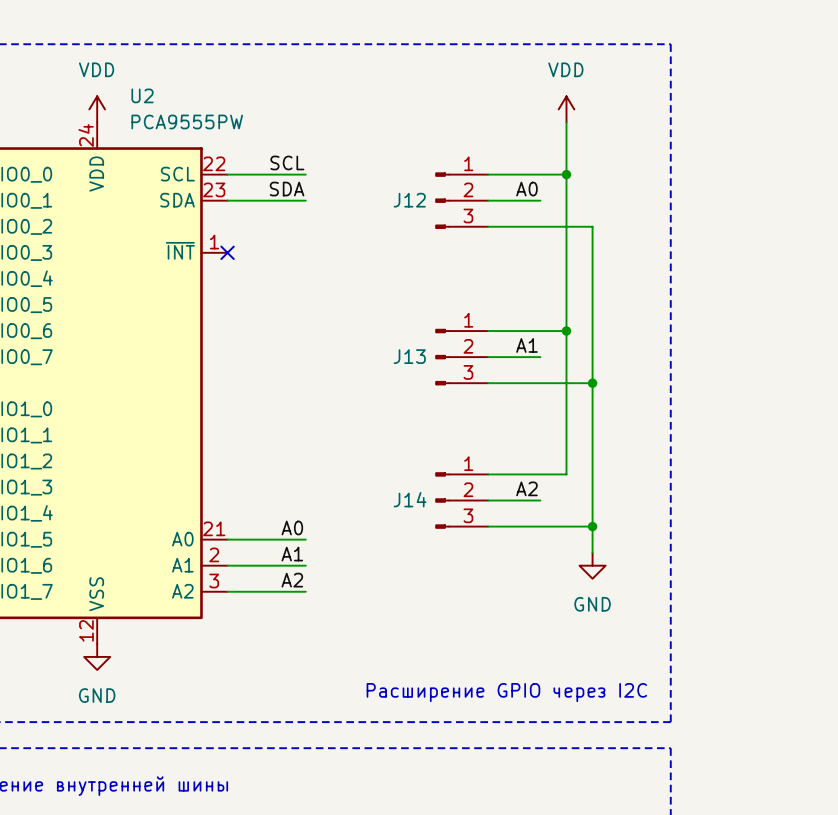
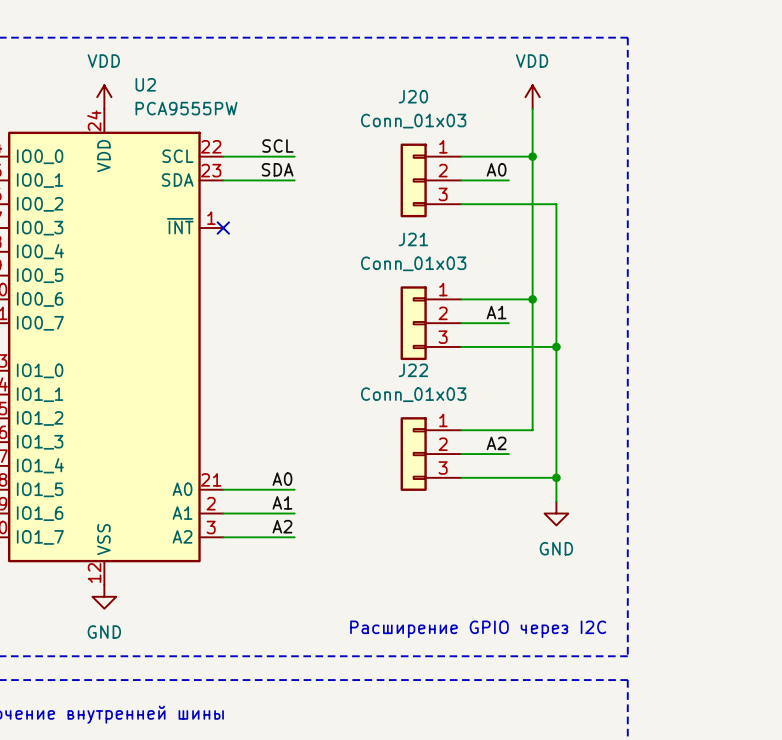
J20: none -> Conn_01x03 (430, 180)
J12: (461, 200) -> none
J21: none -> Conn_01x03 (430, 323)
J13: (461, 357) -> none
J22: none -> Conn_01x03 (430, 454)
J14: (461, 500) -> none

